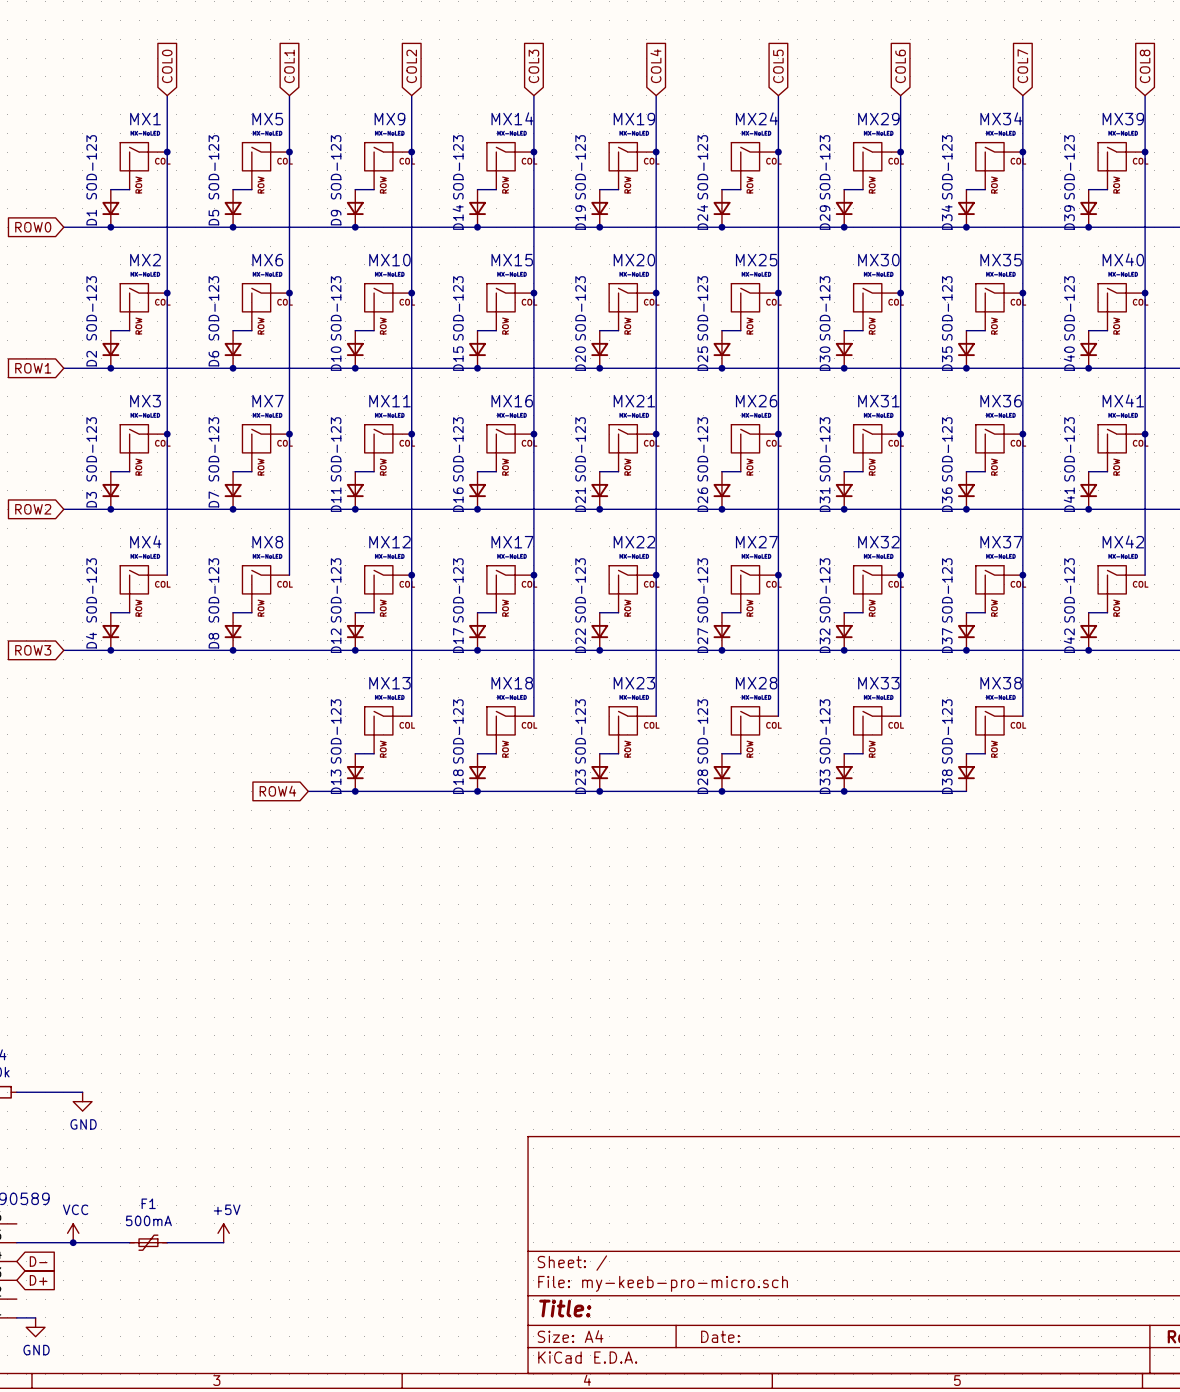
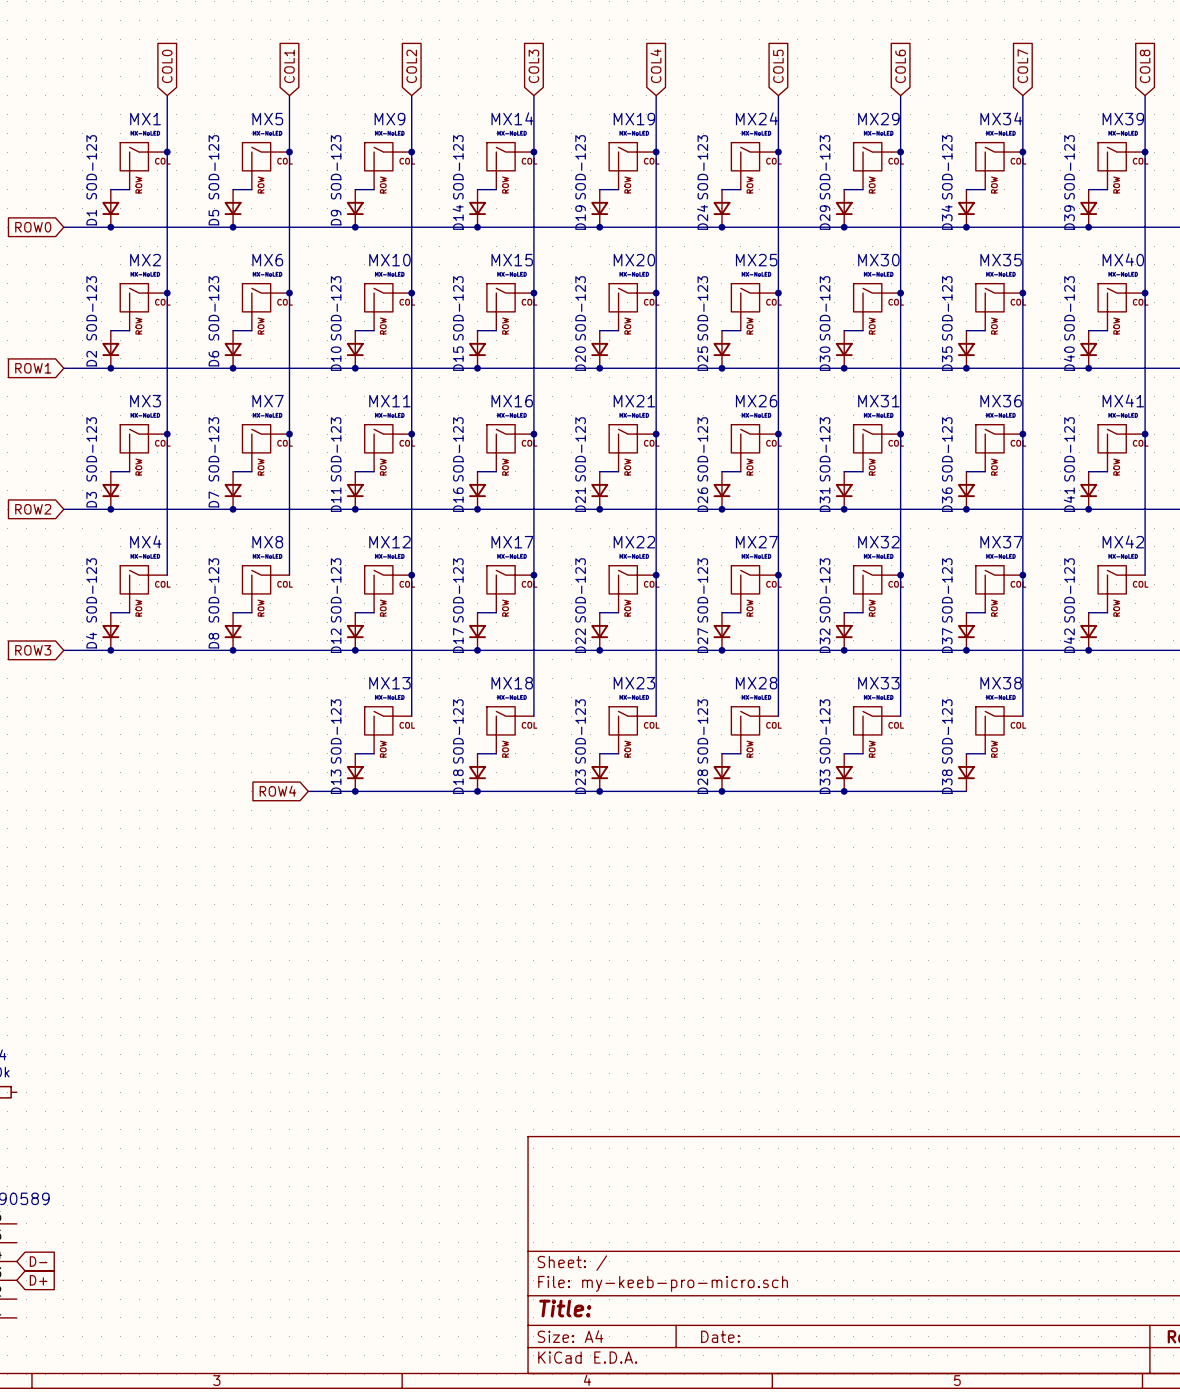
wire: (16, 1092) (82, 1092) -> none
power symbol: GND (82, 1101) -> none
power symbol: VCC (73, 1233) -> none
power symbol: +5V (223, 1233) -> none
wire: (16, 1242) (129, 1242) -> none
junction: (73, 1242) -> none
F1: 500mA (148, 1242) -> none
wire: (167, 1242) (223, 1242) -> none
wire: (16, 1317) (35, 1317) -> none
power symbol: GND (35, 1327) -> none

